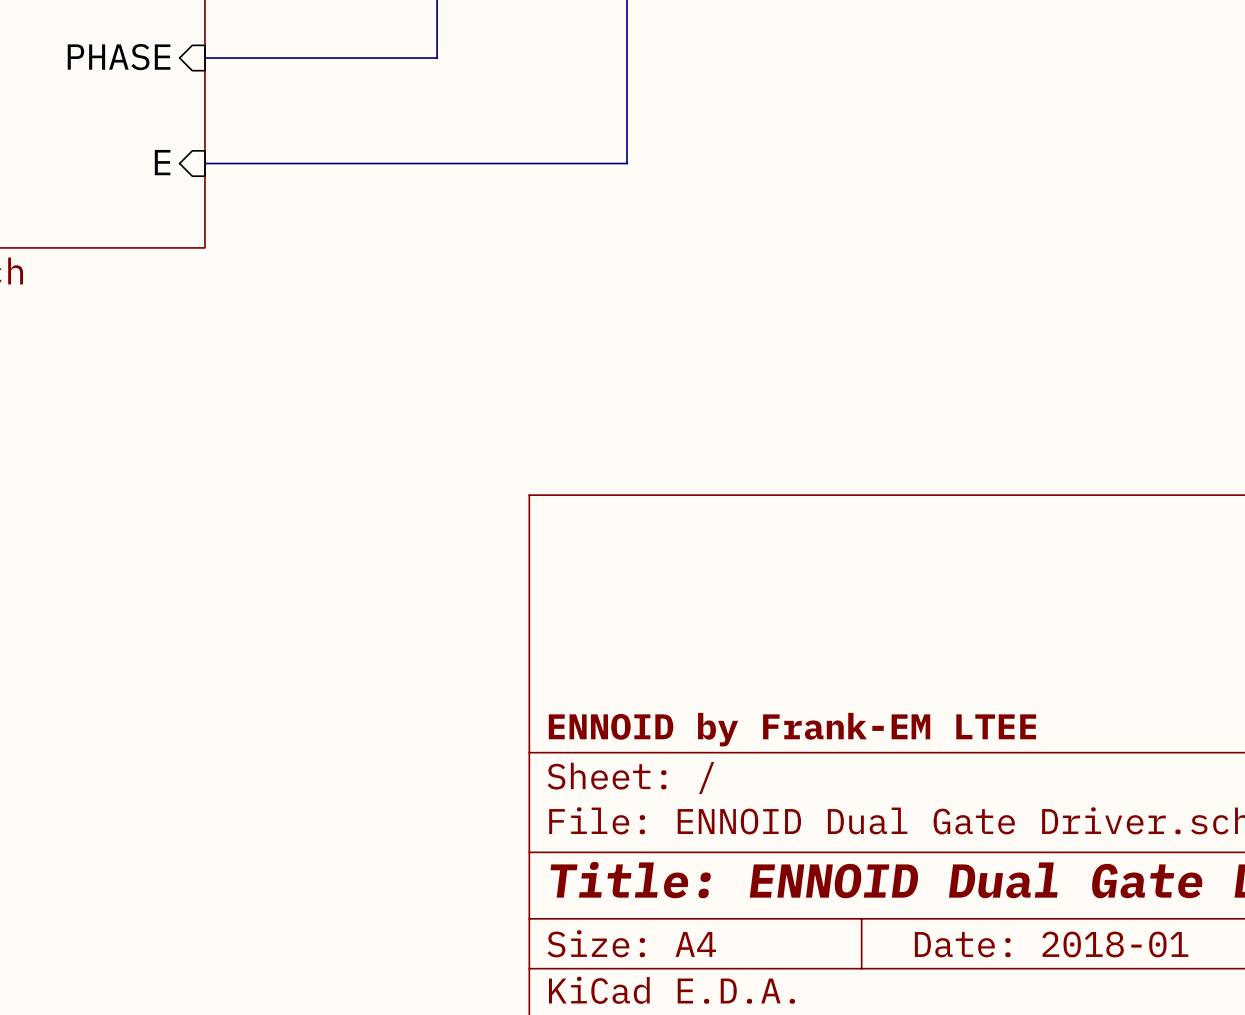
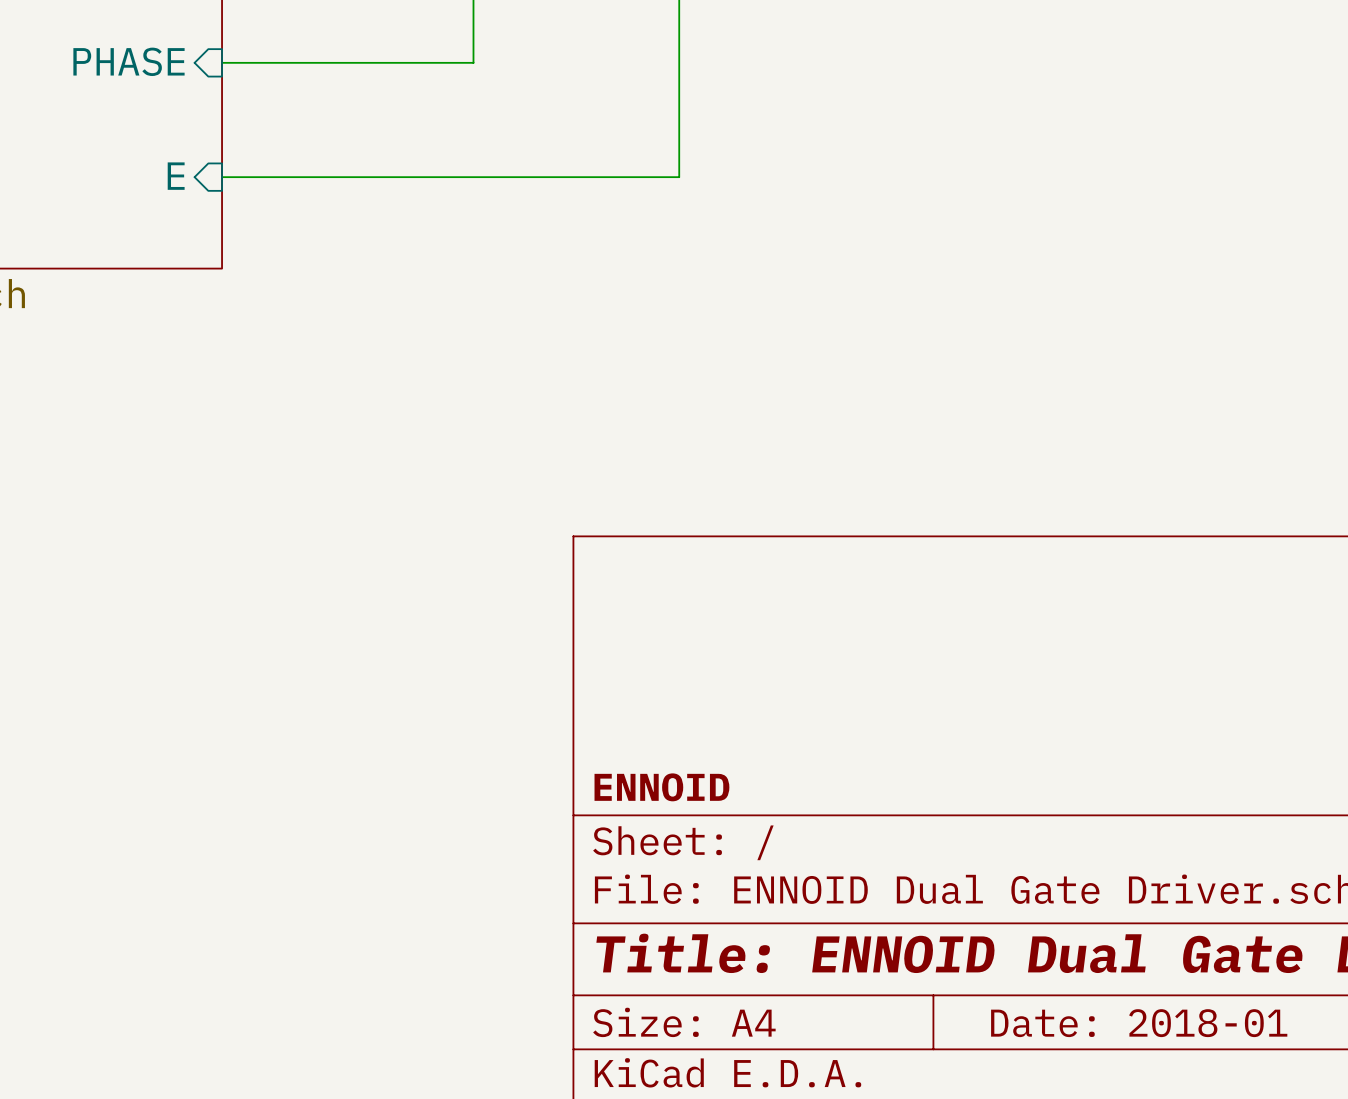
title block: ENNOID by Frank-EM LTEE (792, 729) -> ENNOID (661, 787)

